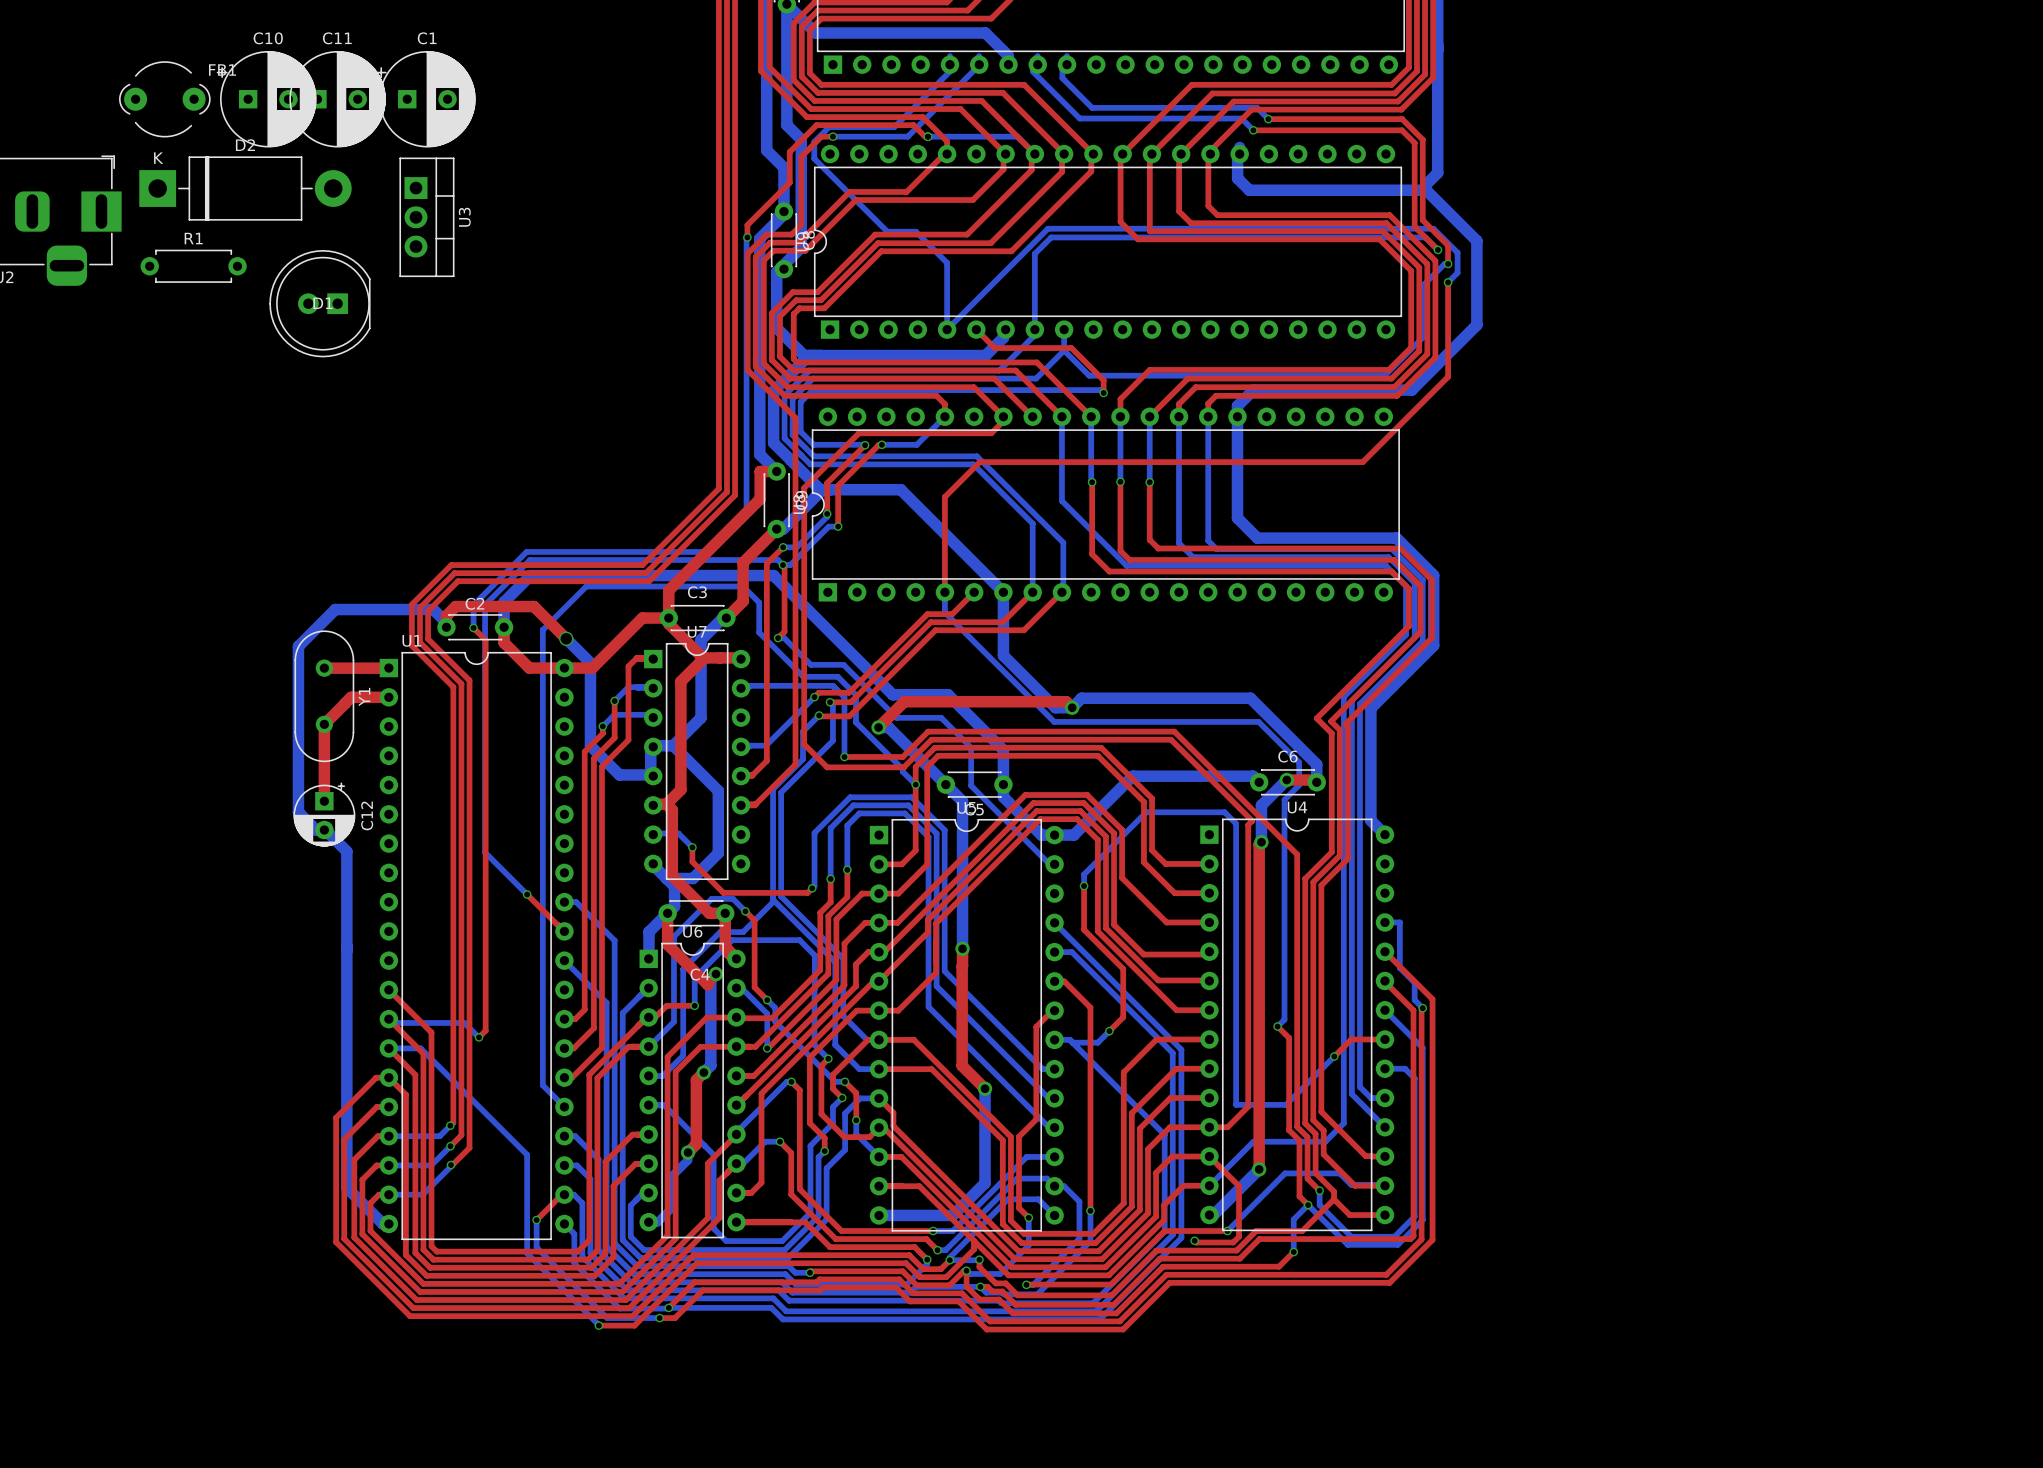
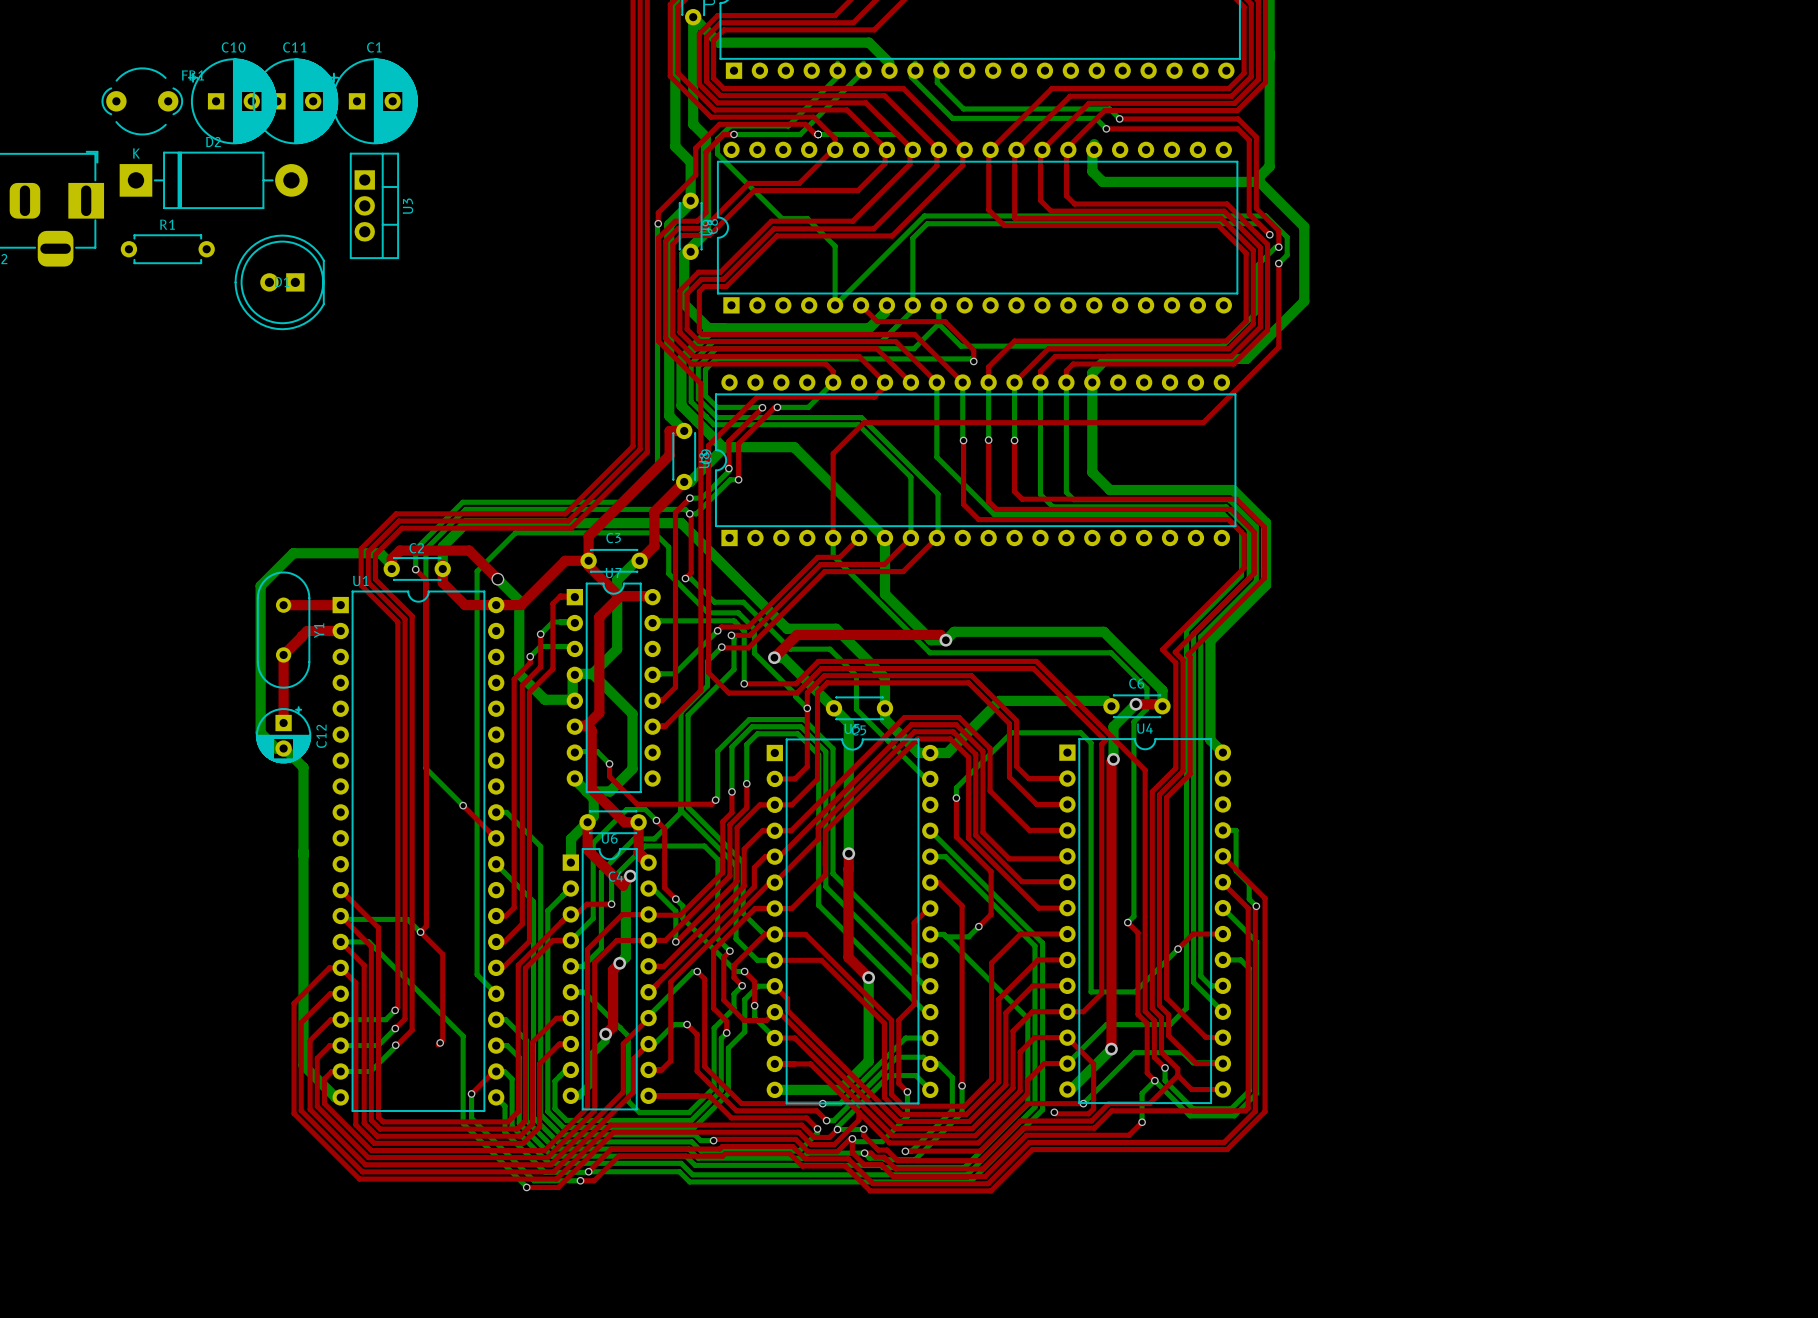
top track: none -> (420, 932) (442, 954) (442, 1040) (438, 1044)
via: none -> (440, 1042)

